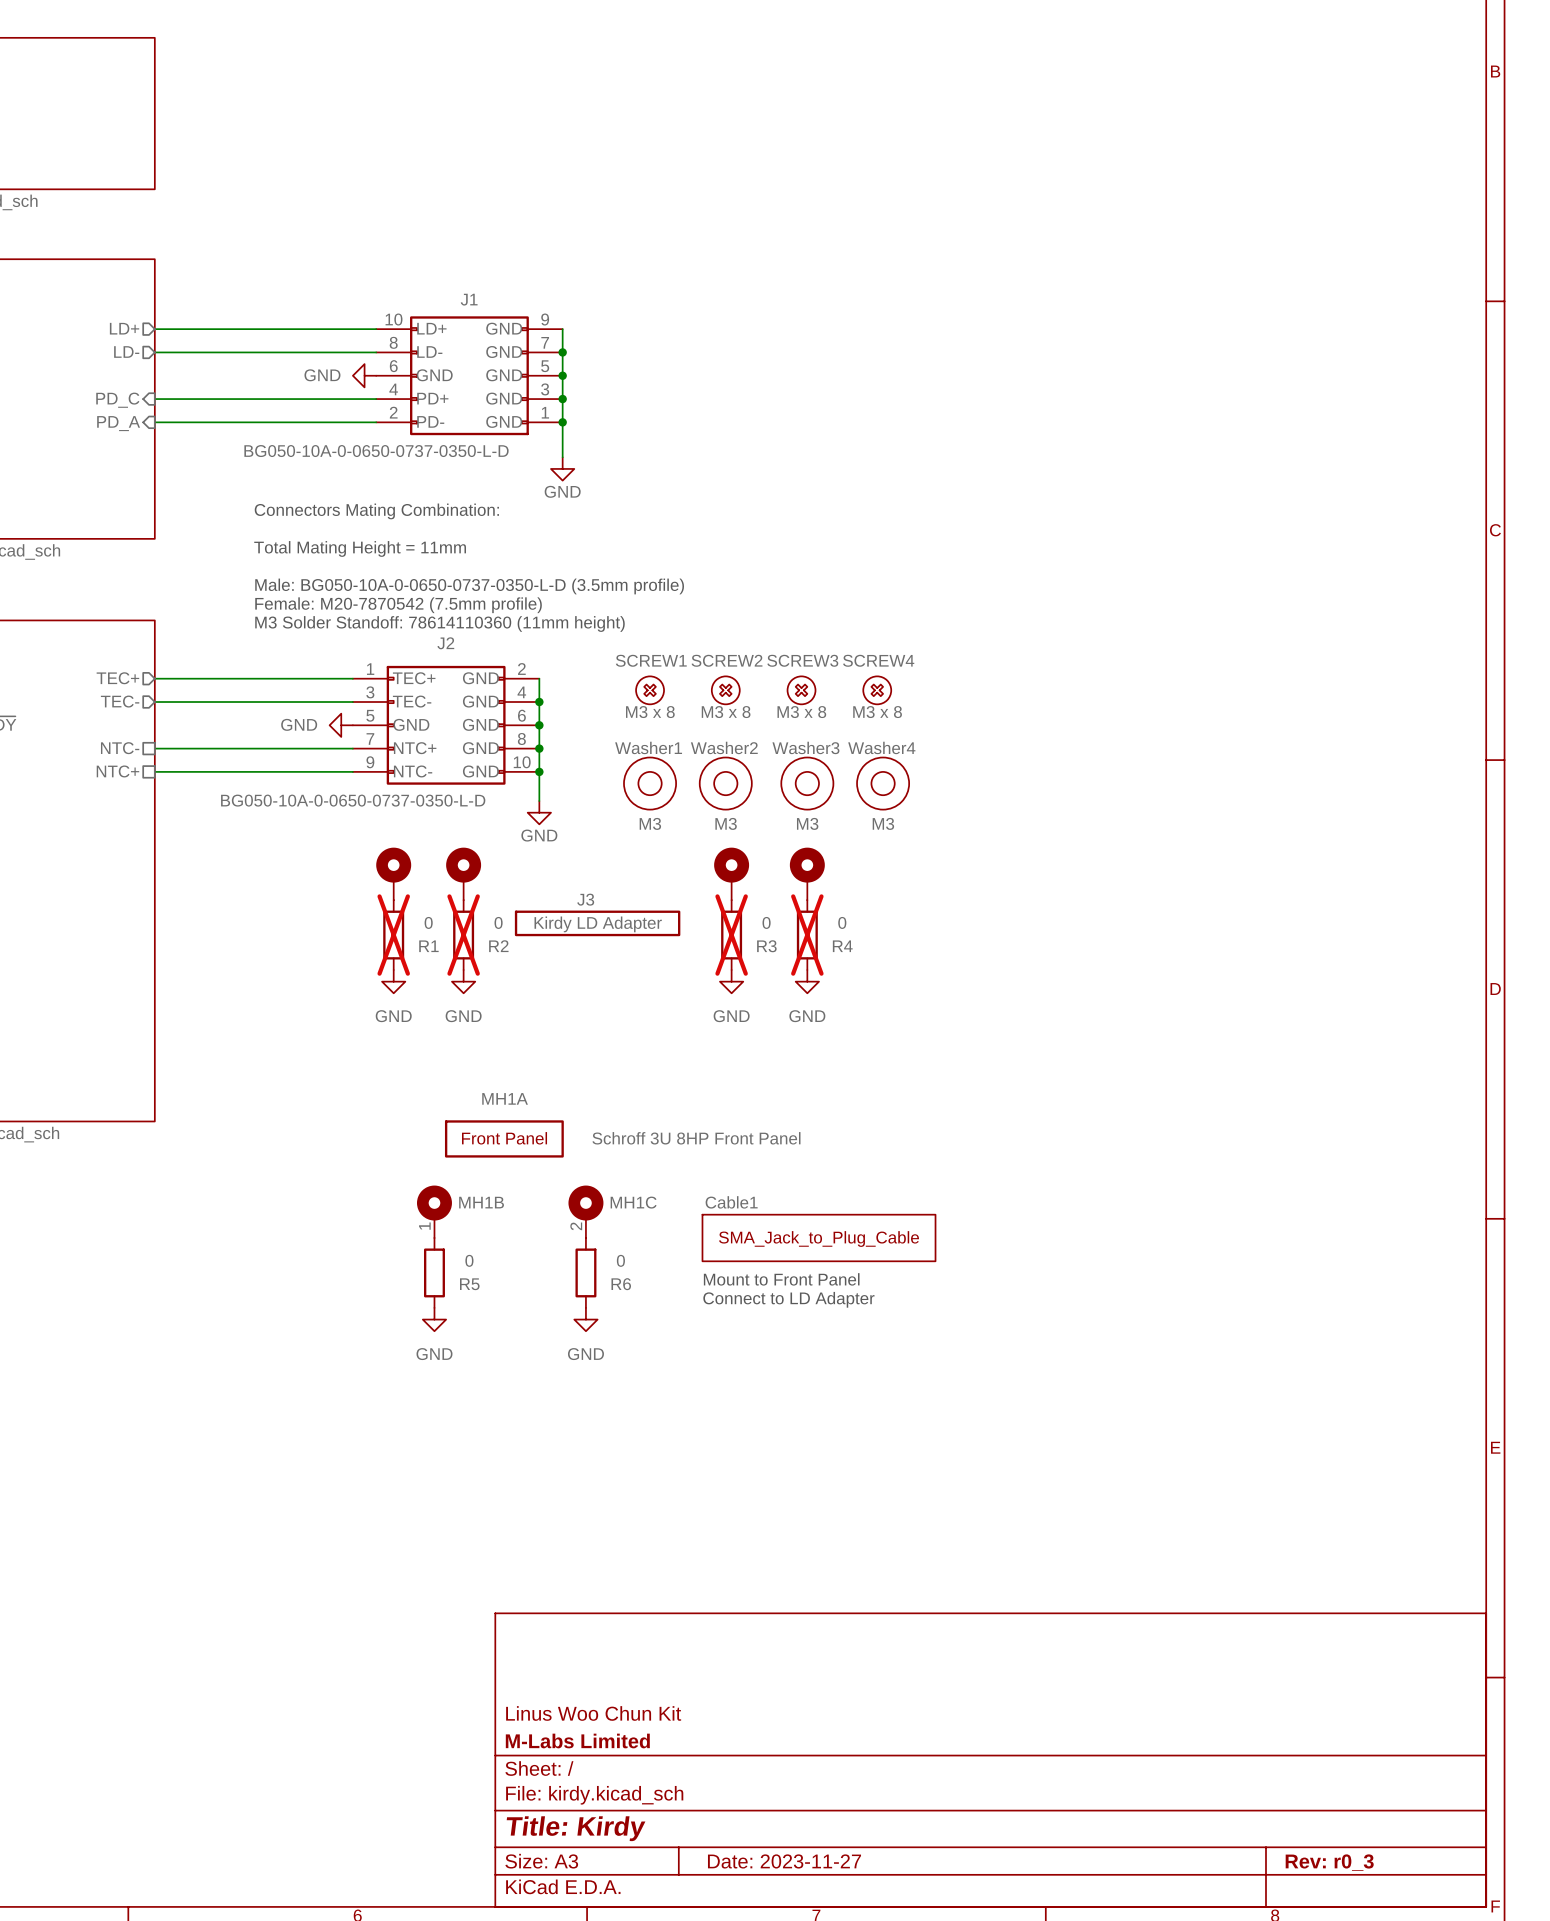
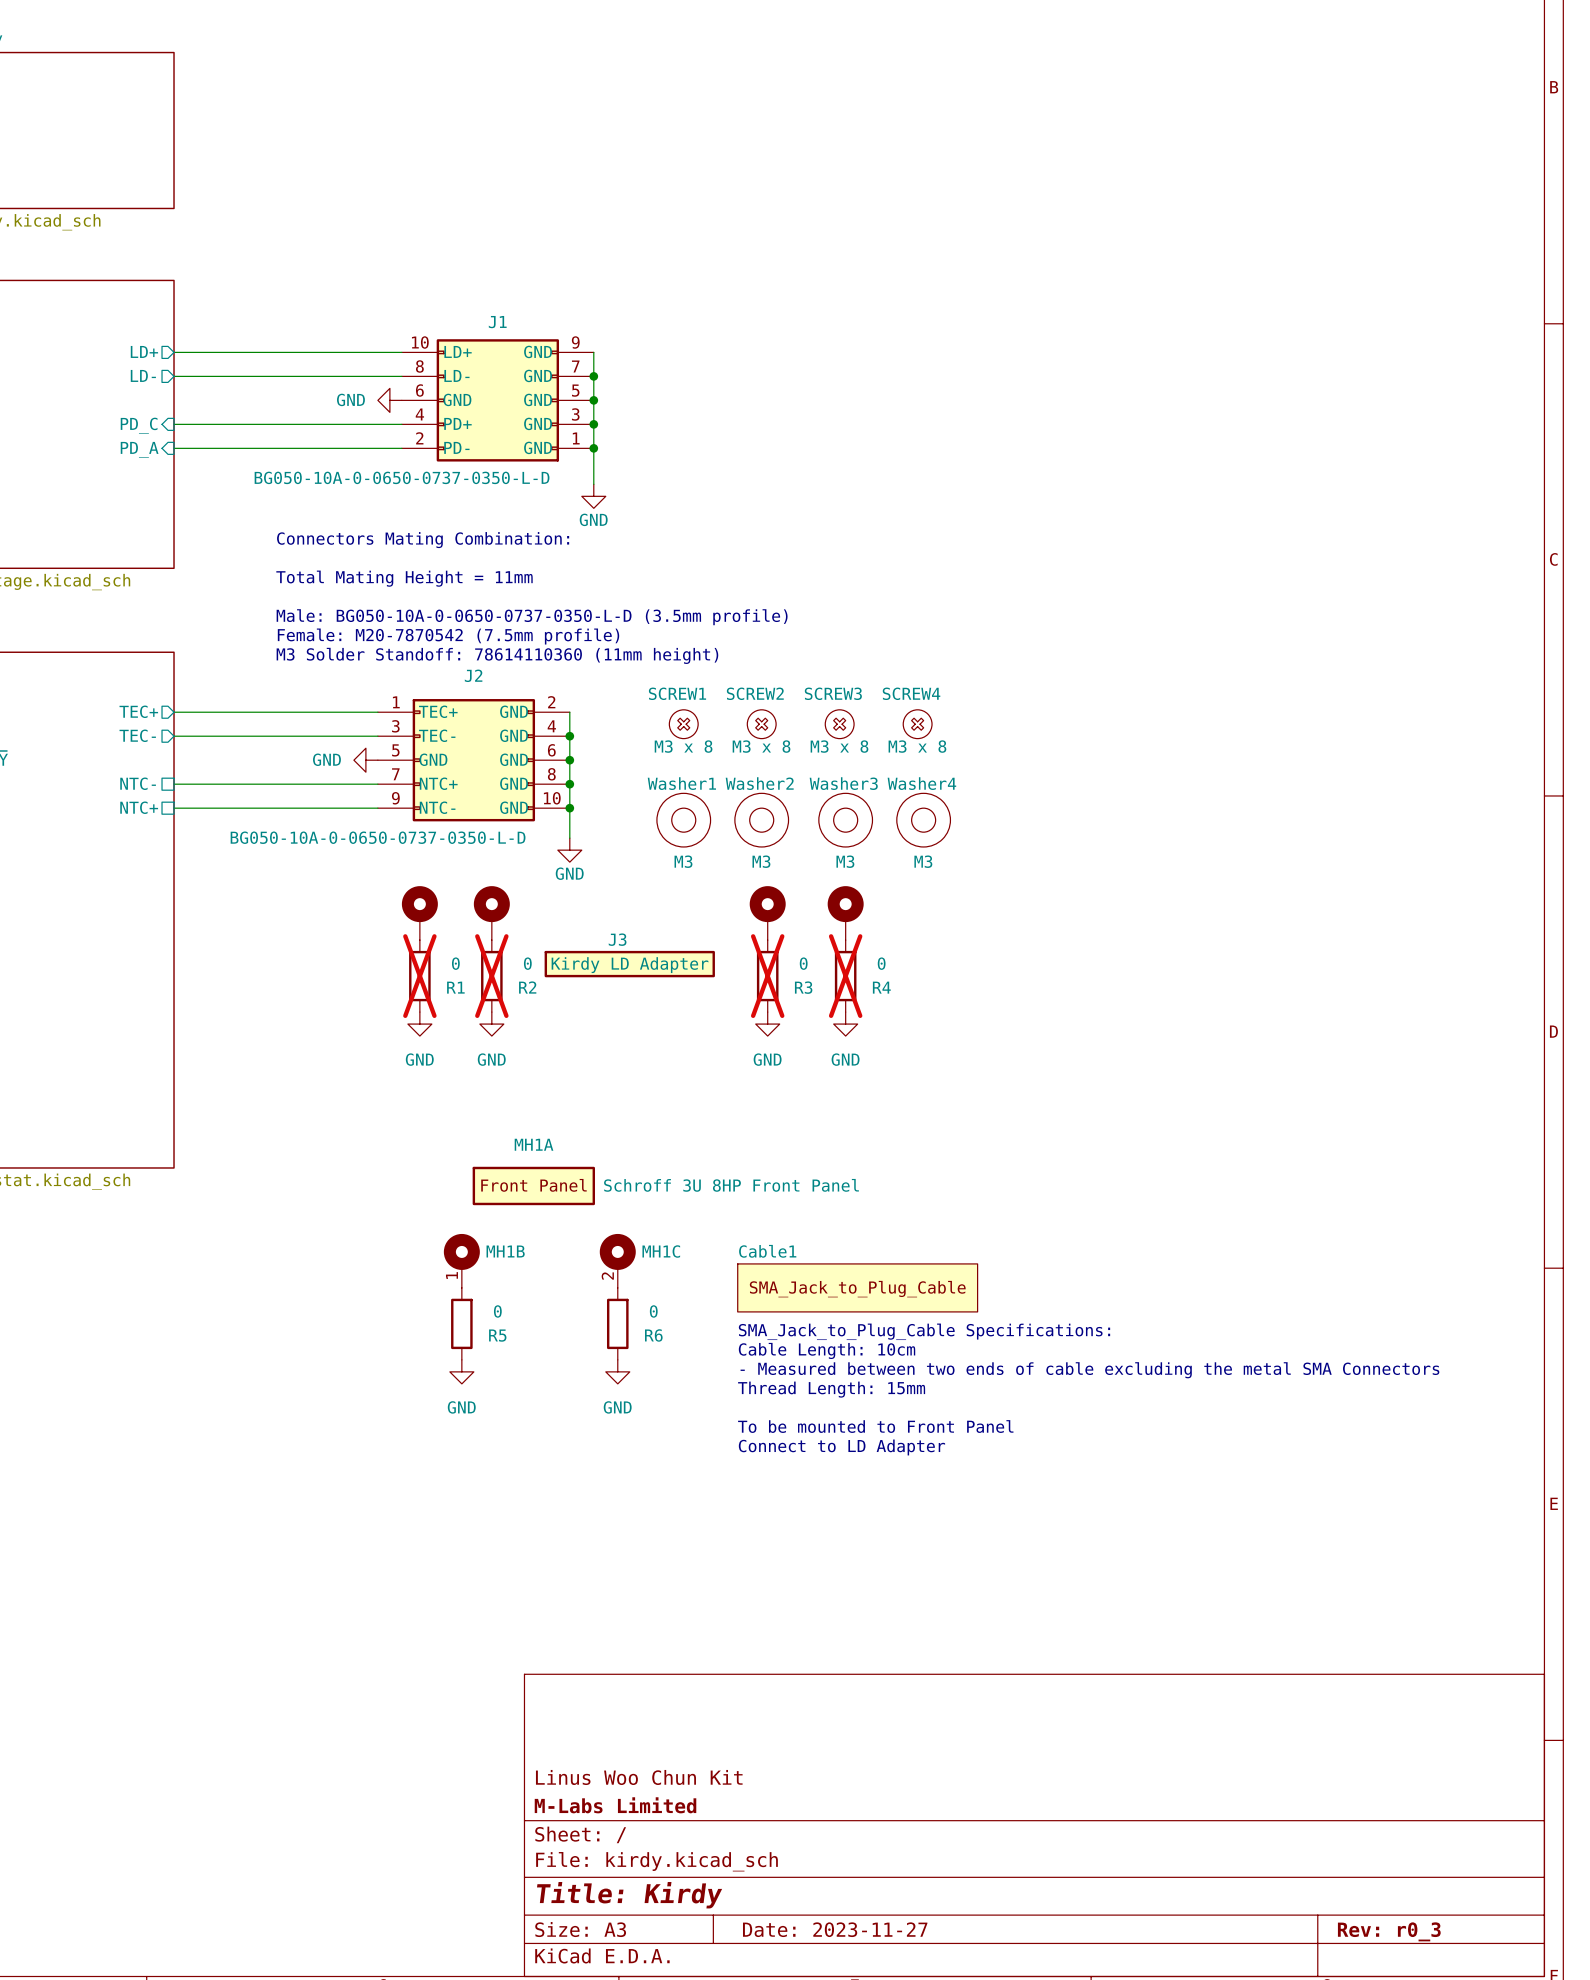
text: Mount to Front Panel (781, 1279) -> SMA_Jack_to_Plug_Cable Specifications: (924, 1331)
text: Connect to LD Adapter (788, 1299) -> Cable Length: 10cm (827, 1350)
text: none -> - Measured between two ends of cable excluding the metal SMA Connectors (1089, 1370)
text: none -> Thread Length: 15mm (831, 1389)
text: none -> To be mounted to Front Panel (875, 1426)
text: none -> Connect to LD Adapter (841, 1447)

